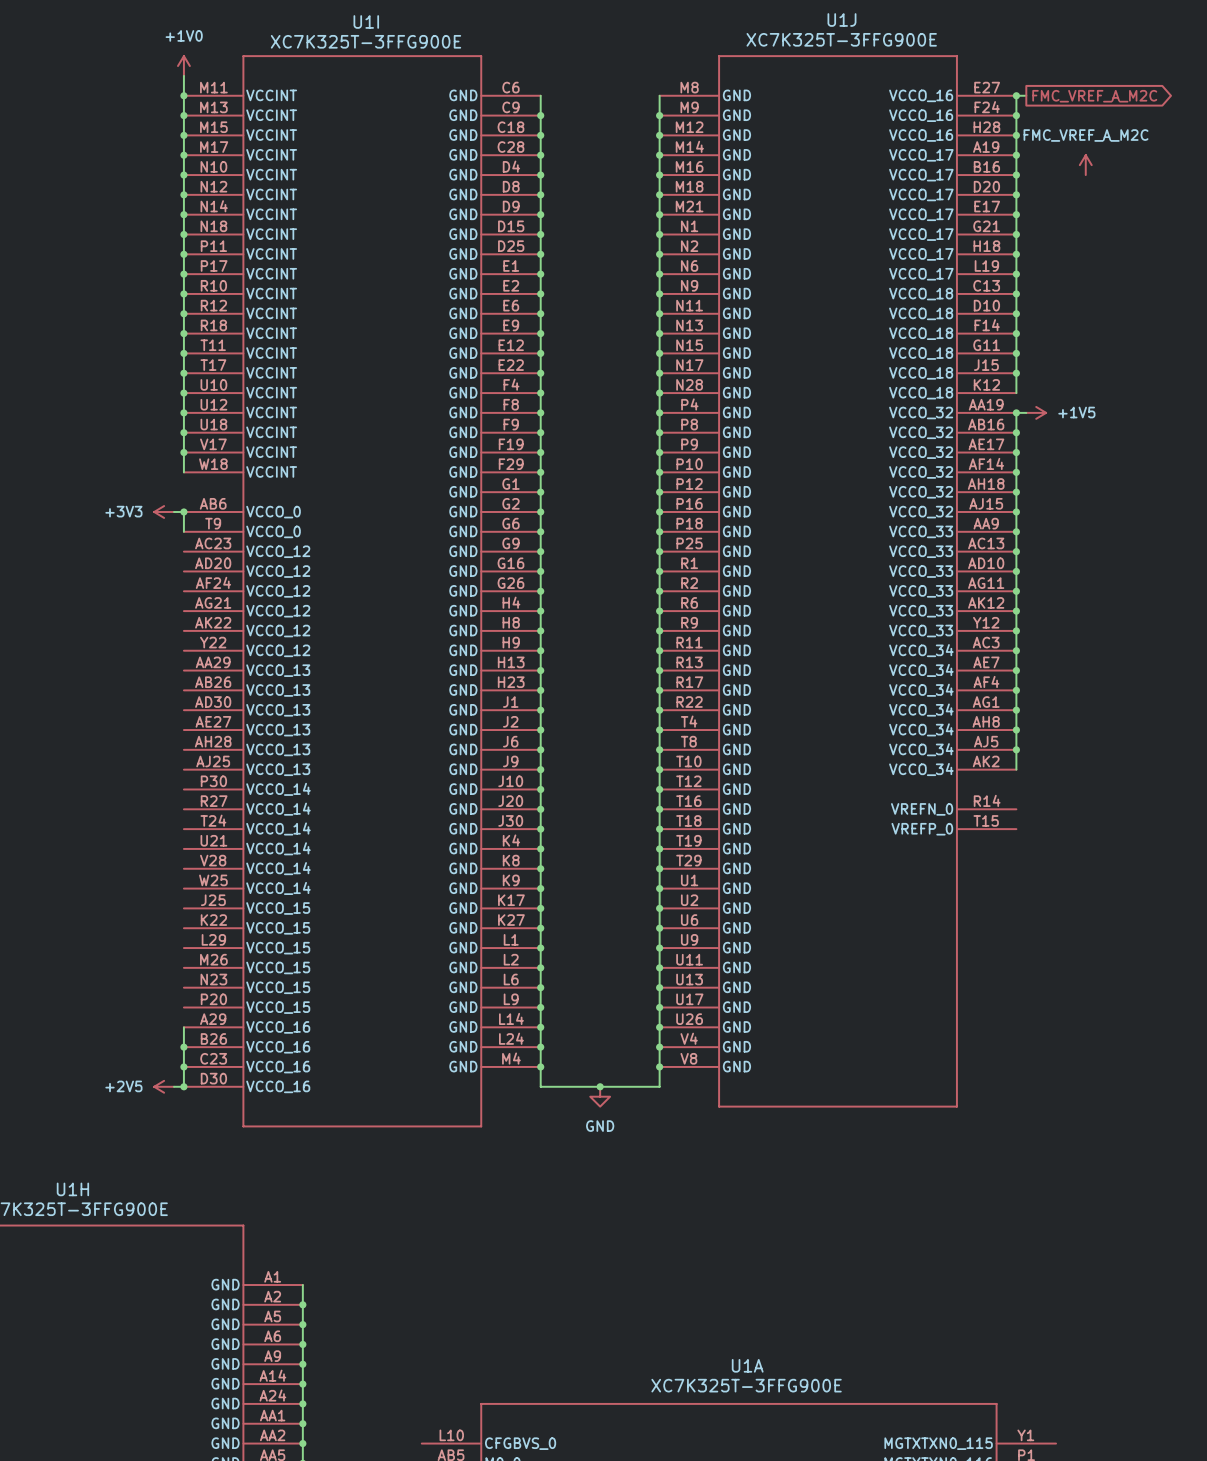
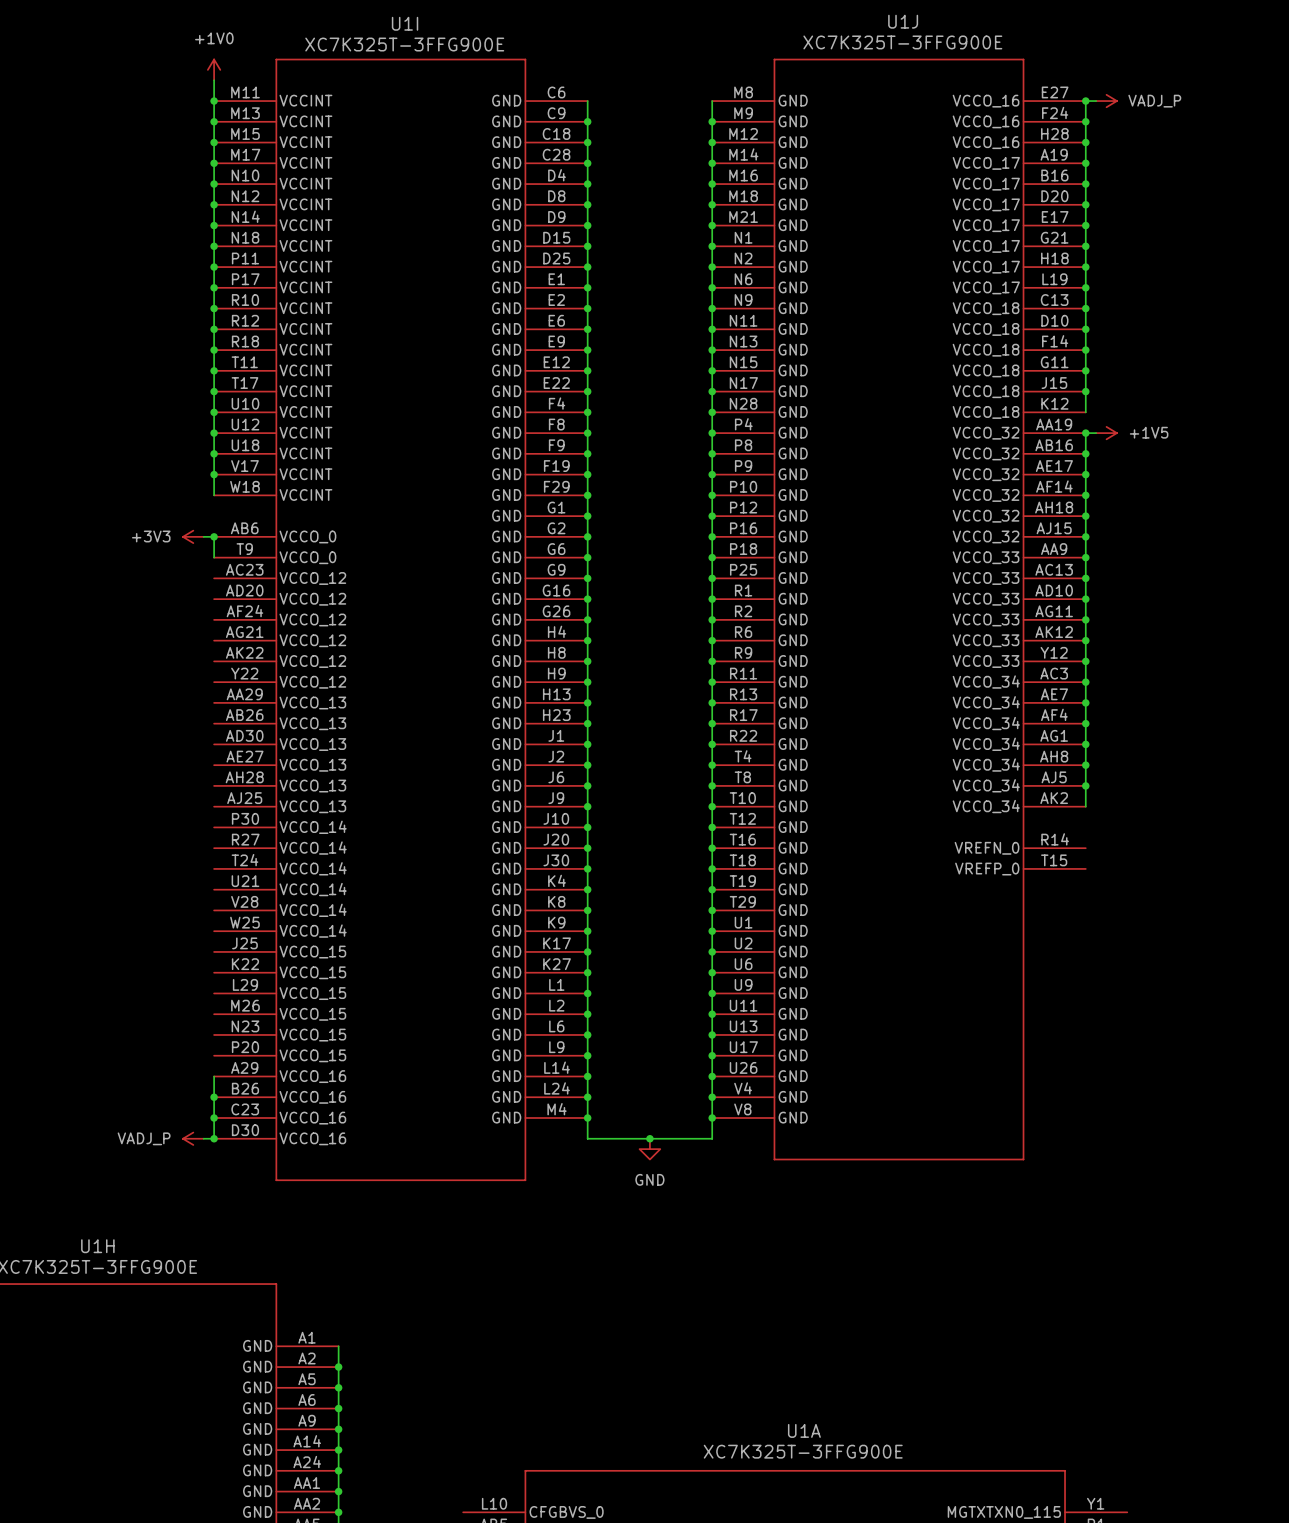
power symbol: none -> VADJ_P (1106, 101)
global label: FMC_VREF_A_M2C (1094, 96) -> none
power symbol: FMC_VREF_A_M2C (1085, 165) -> none
power symbol: +2V5 (164, 1086) -> VADJ_P (193, 1138)

